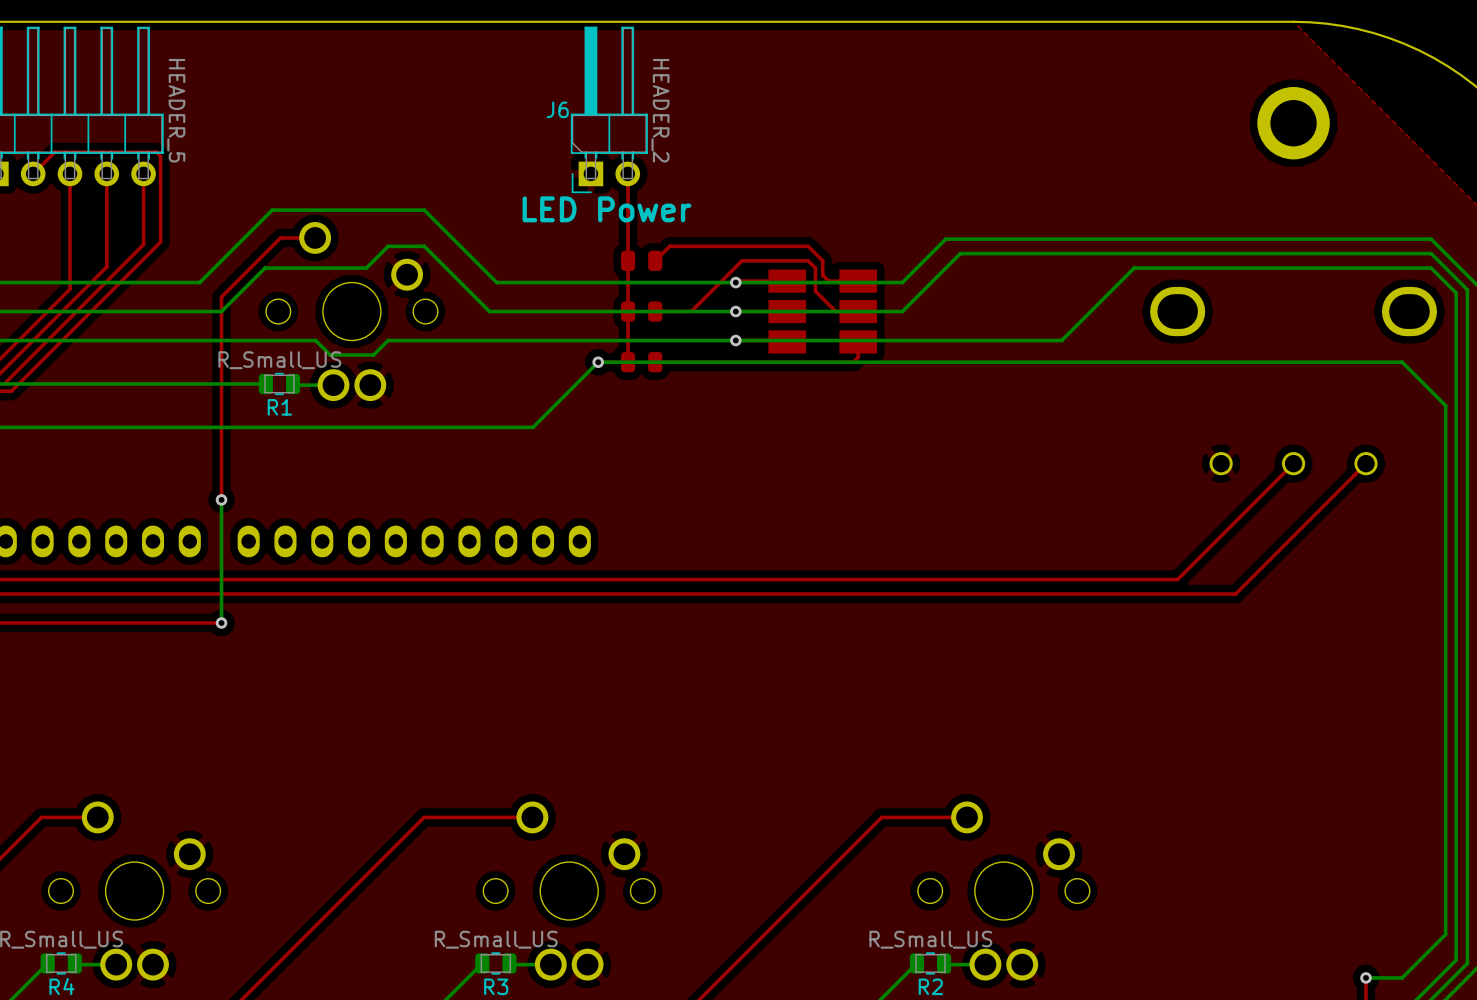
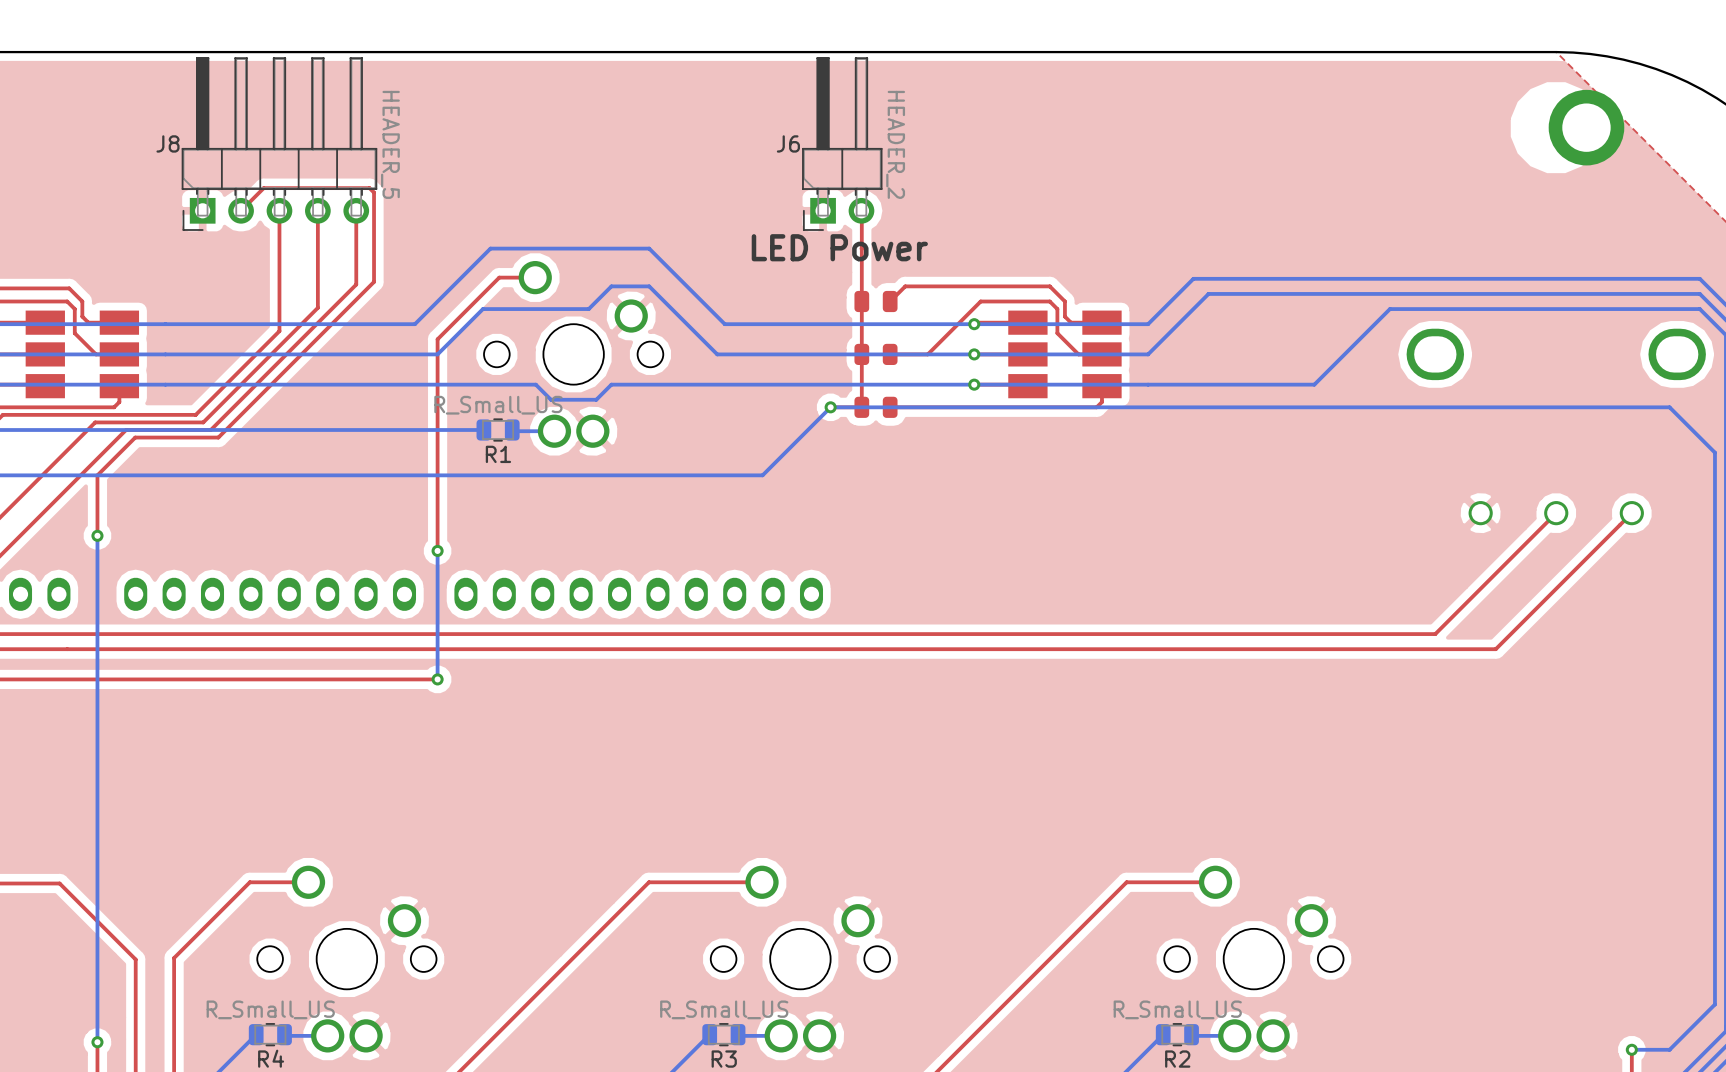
part position: (1293, 123) -> (1586, 127)

